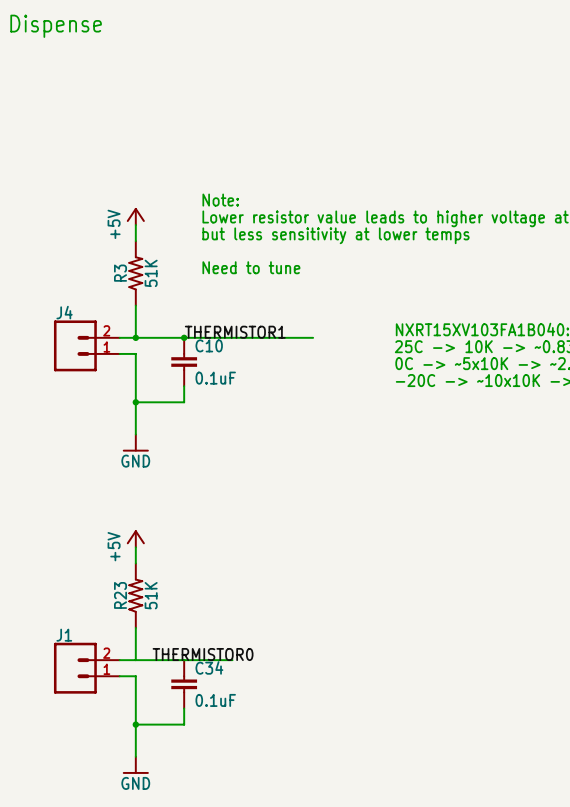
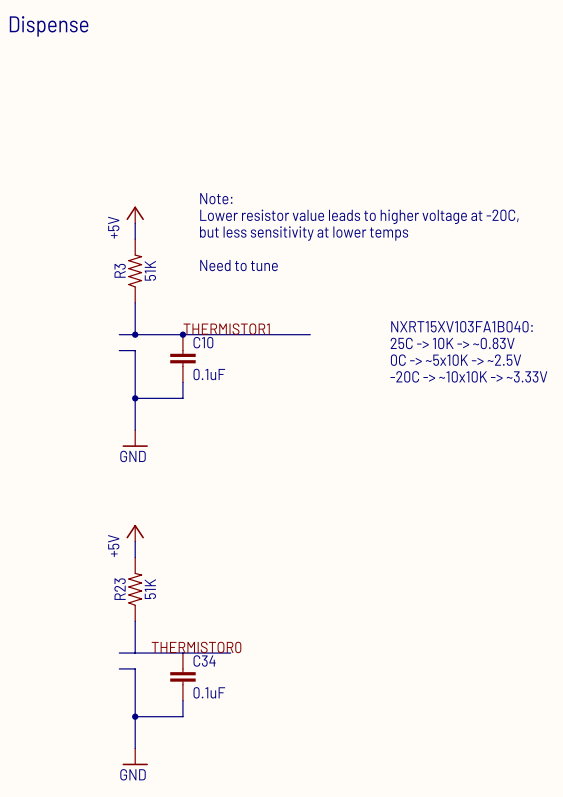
J4: (86, 345) -> none
J1: (86, 668) -> none

